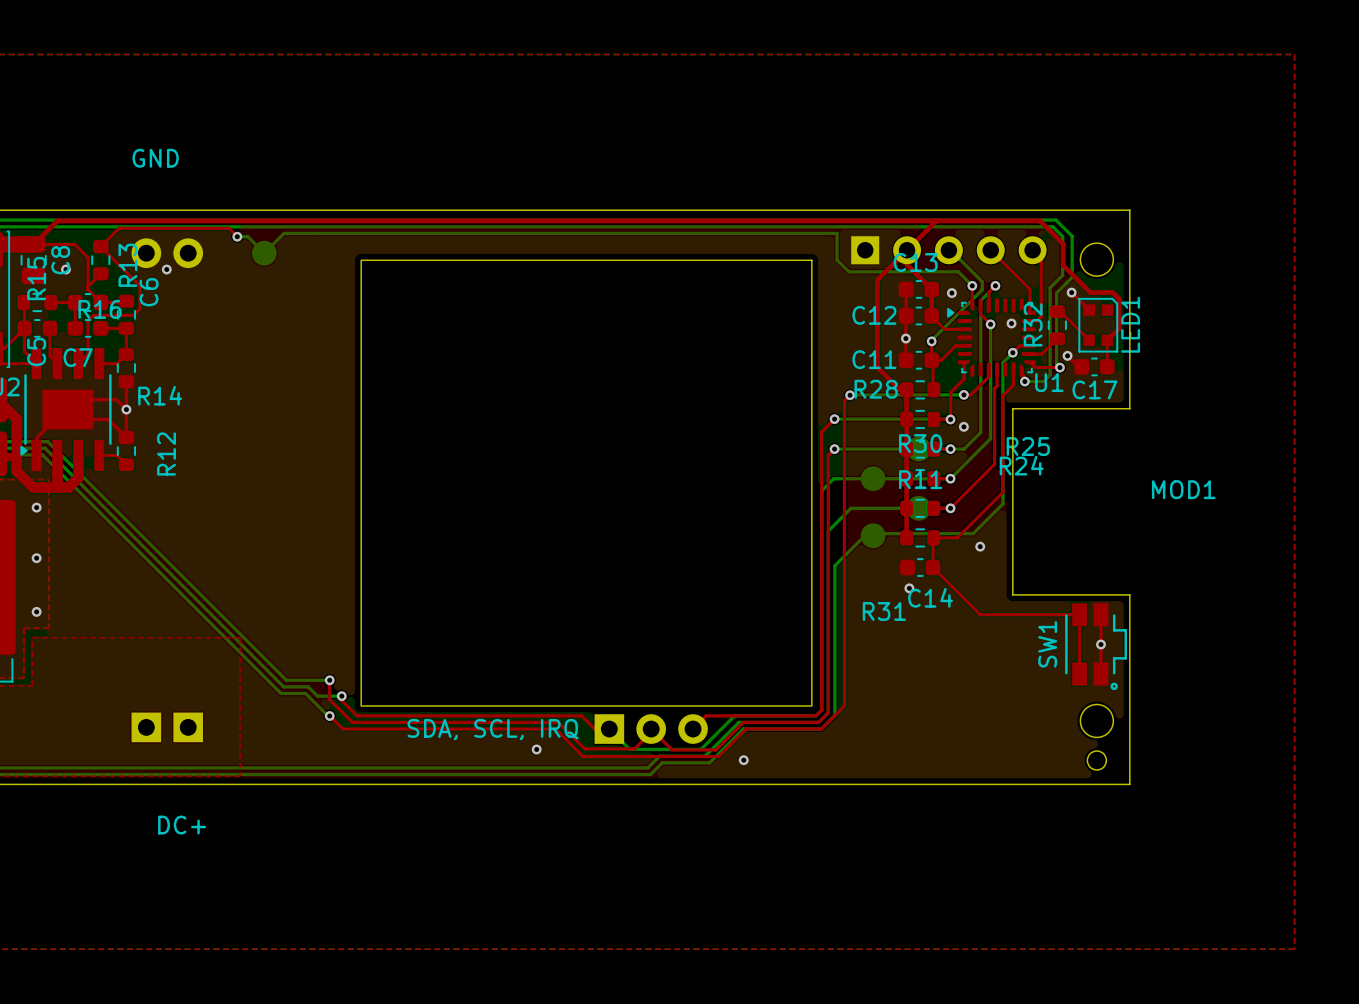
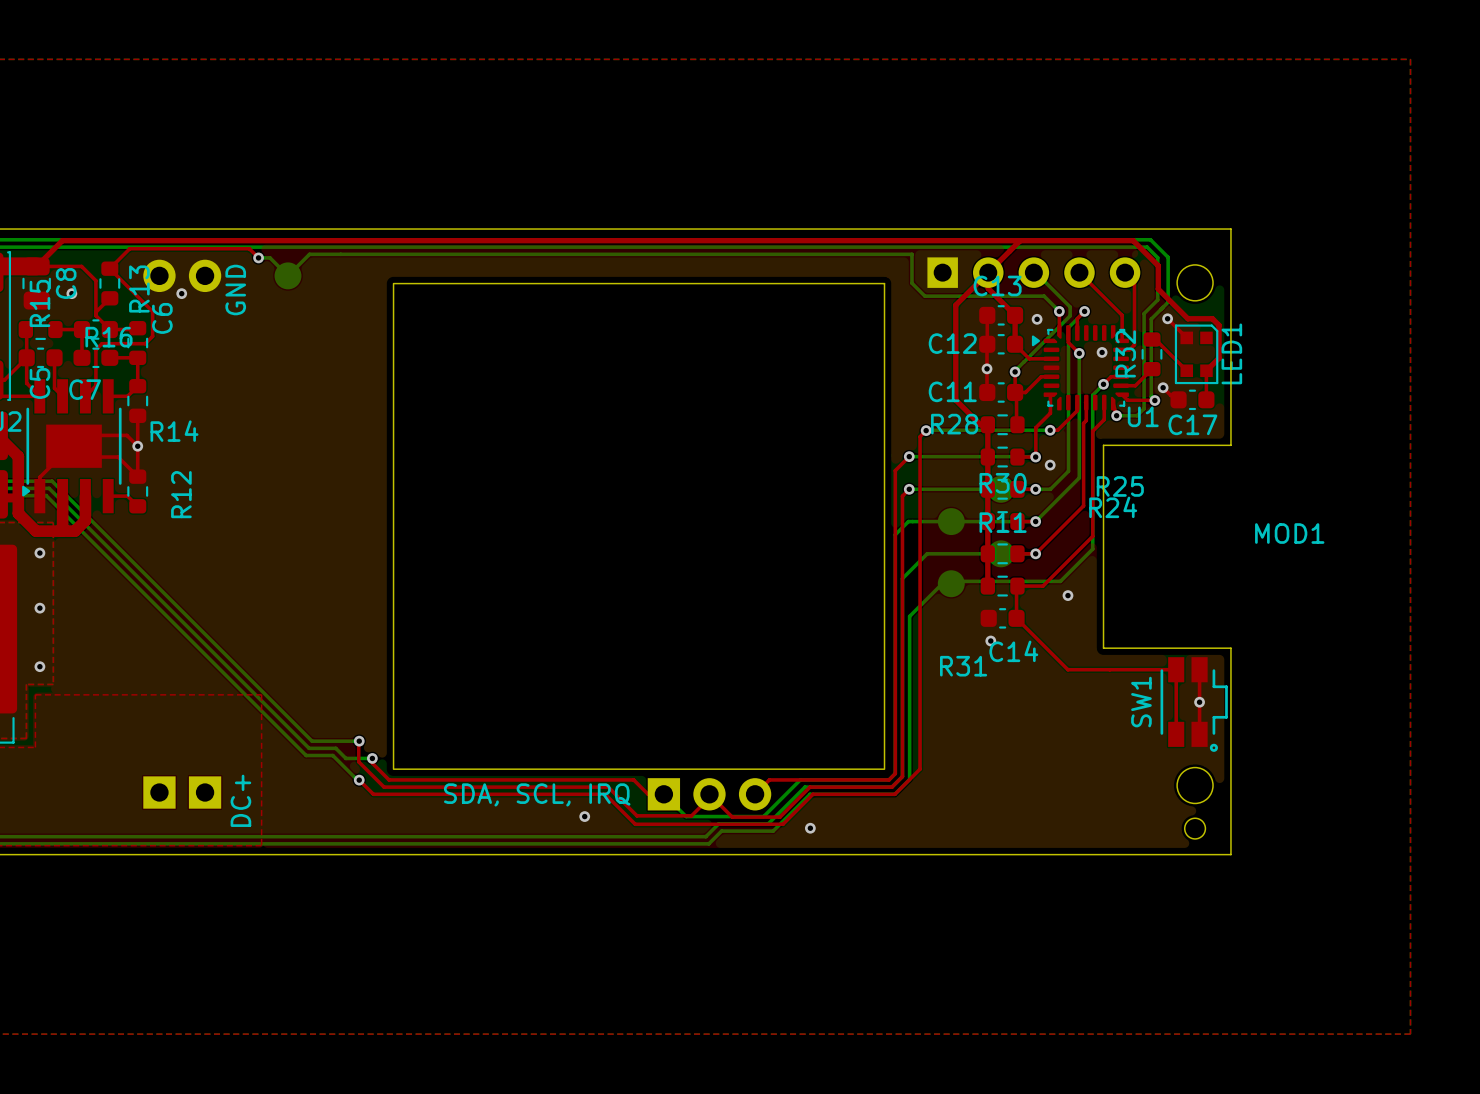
MOD1 text rotation: 0° (155, 158) -> 90° counterclockwise (235, 290)
MOD1 text position: GND (155, 158) -> GND (235, 290)
MOD1 text rotation: 0° (182, 825) -> 90° counterclockwise (240, 800)
MOD1 text position: DC+ (182, 825) -> DC+ (240, 800)

